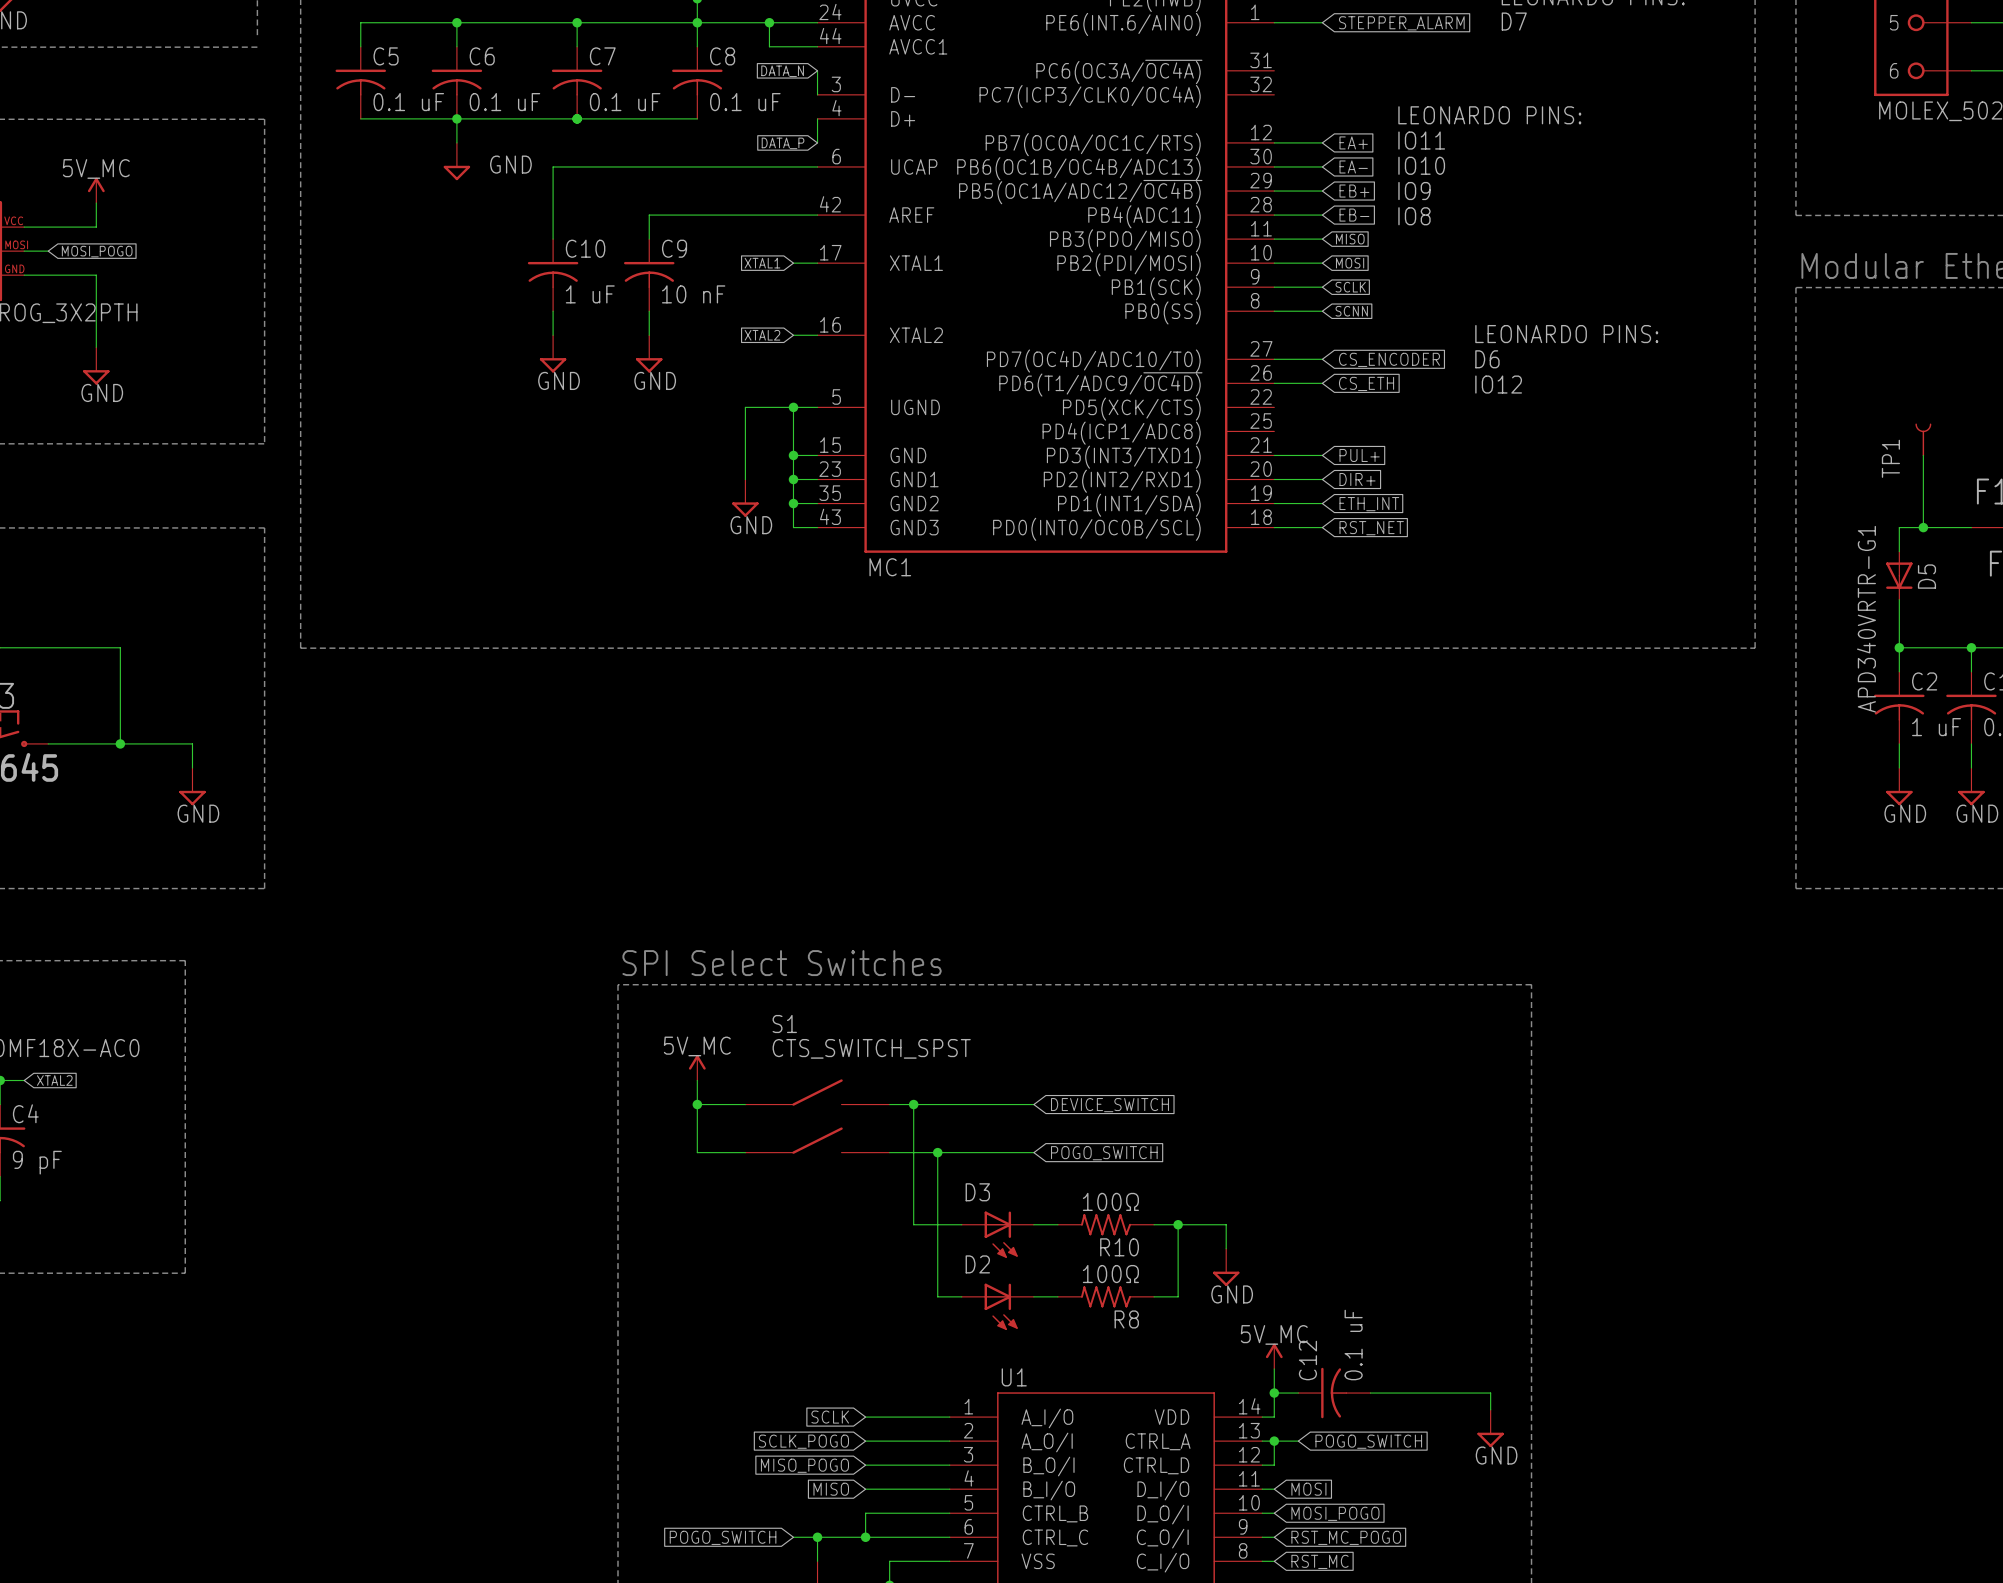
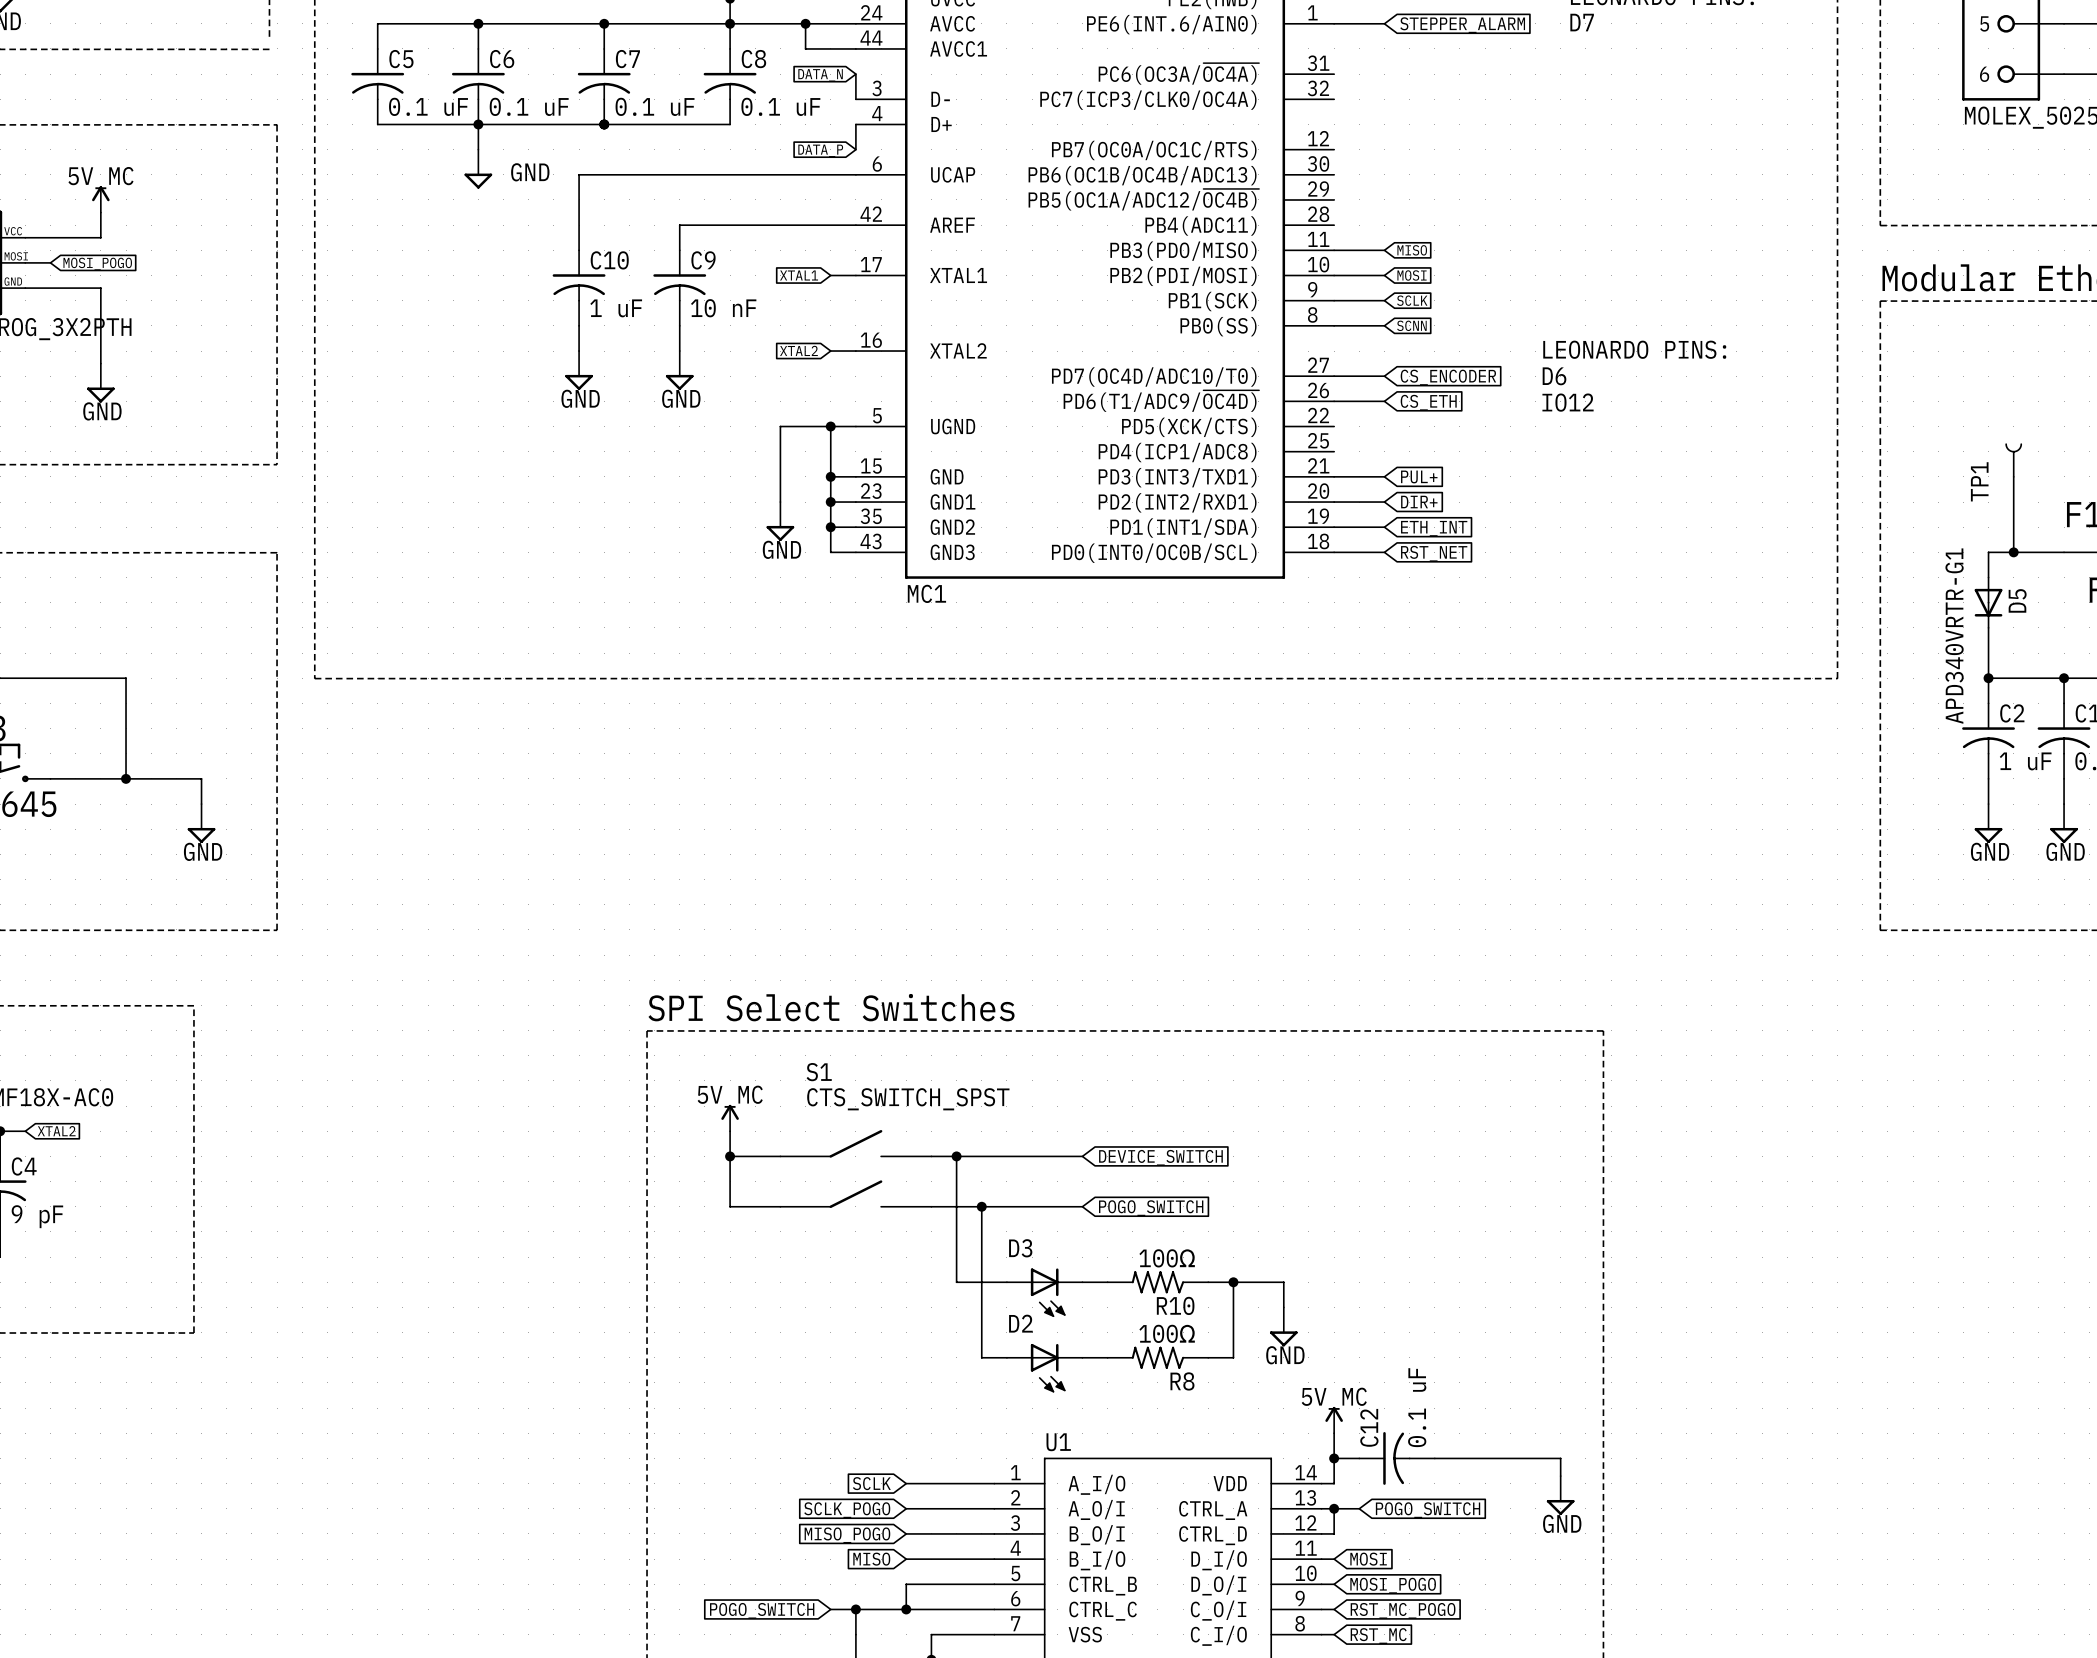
text: LEONARDO PINS: (1489, 115) -> none
text: IO11 (1421, 140) -> none
wire: (1274, 142) (1322, 142) -> none
global label: EA+ (1353, 142) -> none
text: IO10 (1421, 165) -> none
wire: (1274, 166) (1322, 166) -> none
global label: EA- (1353, 166) -> none
wire: (1274, 191) (1322, 191) -> none
global label: EB+ (1354, 191) -> none
text: IO9 (1414, 191) -> none
wire: (1274, 215) (1322, 215) -> none
global label: EB- (1354, 215) -> none
text: IO8 (1414, 216) -> none

